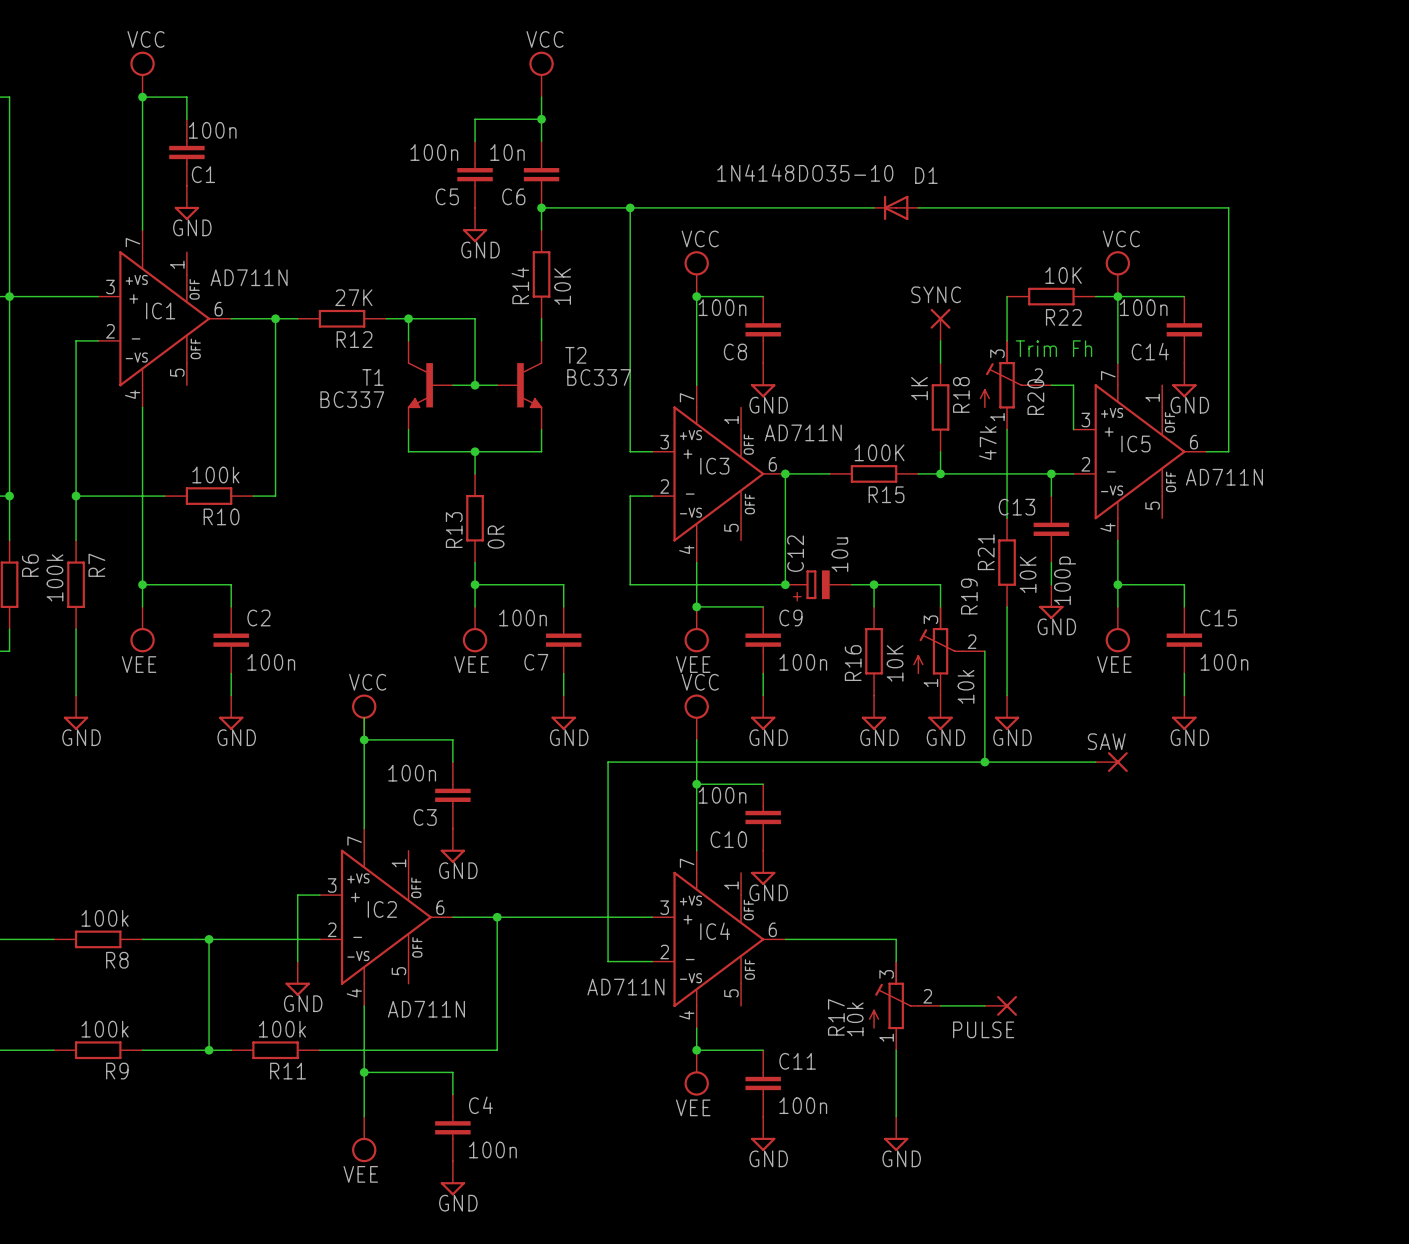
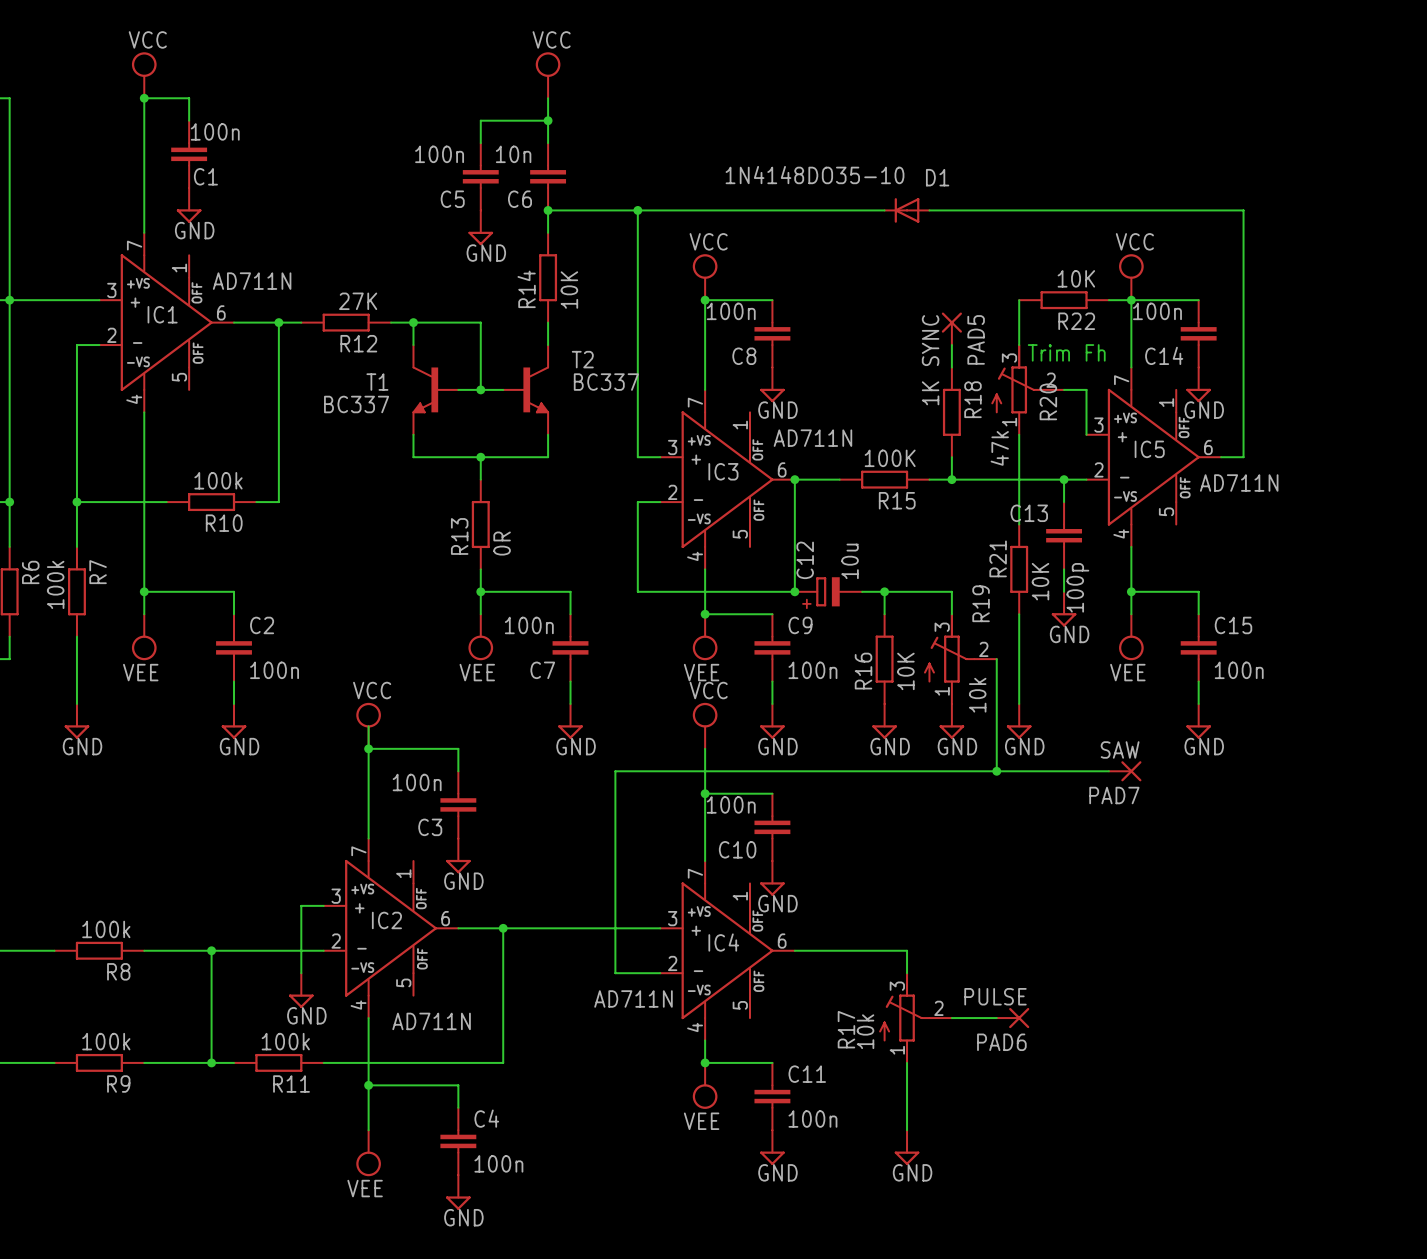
SYNC name: SYNC (936, 294) -> PAD5 (976, 339)
SYNC value: none -> SYNC (930, 340)
SAW name: SAW (1106, 741) -> PAD7 (1114, 795)
SAW value: none -> SAW (1120, 749)
PULSE value: none -> PULSE (995, 996)
PULSE name: PULSE (983, 1029) -> PAD6 (1001, 1042)

